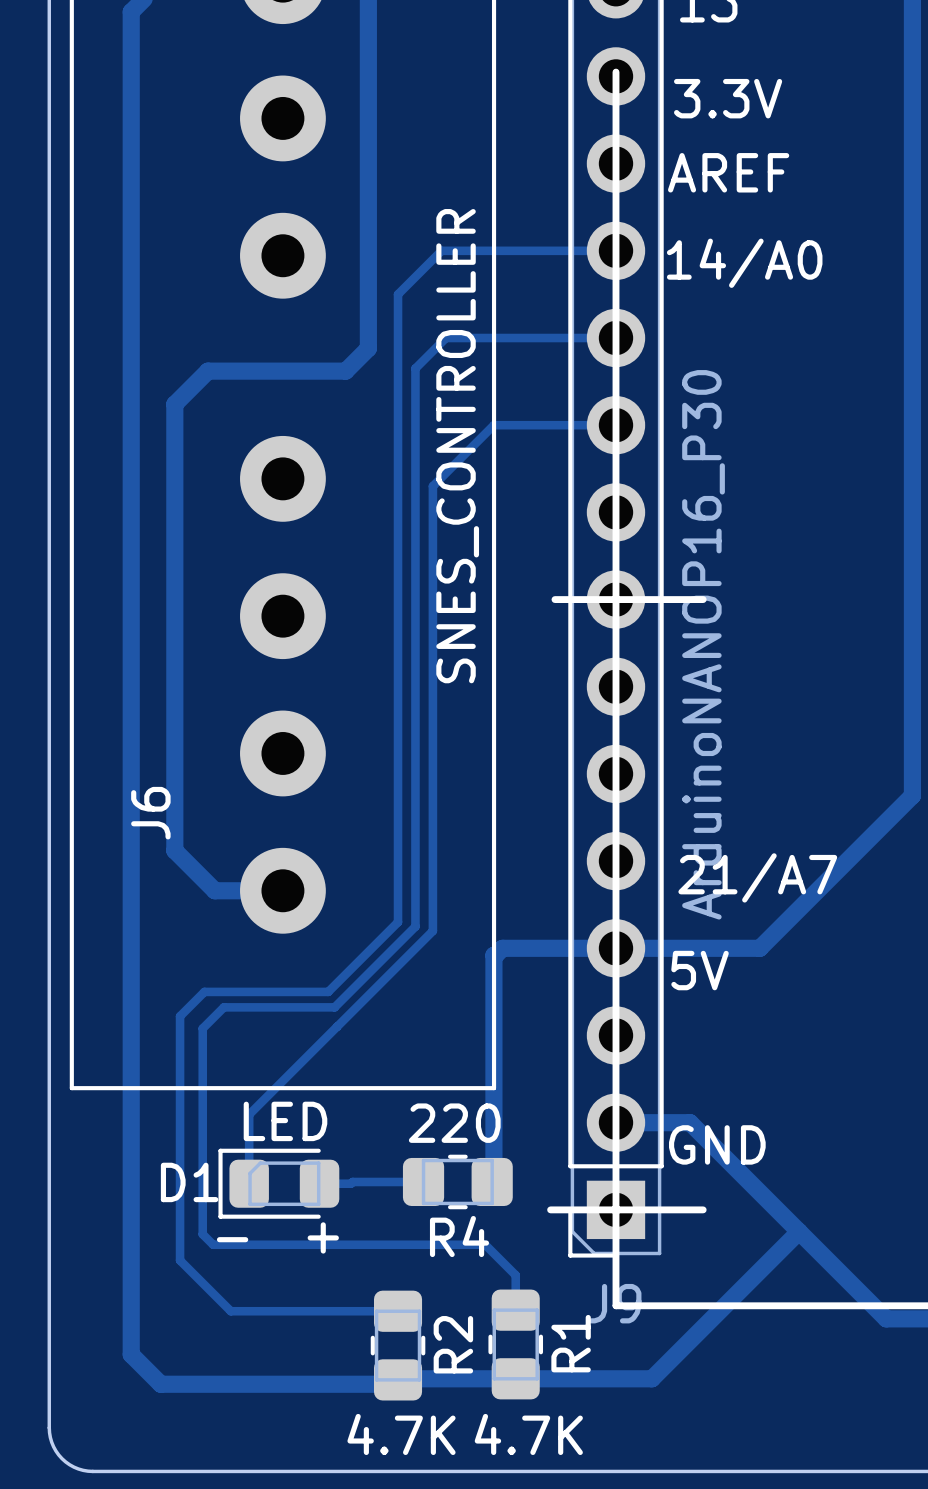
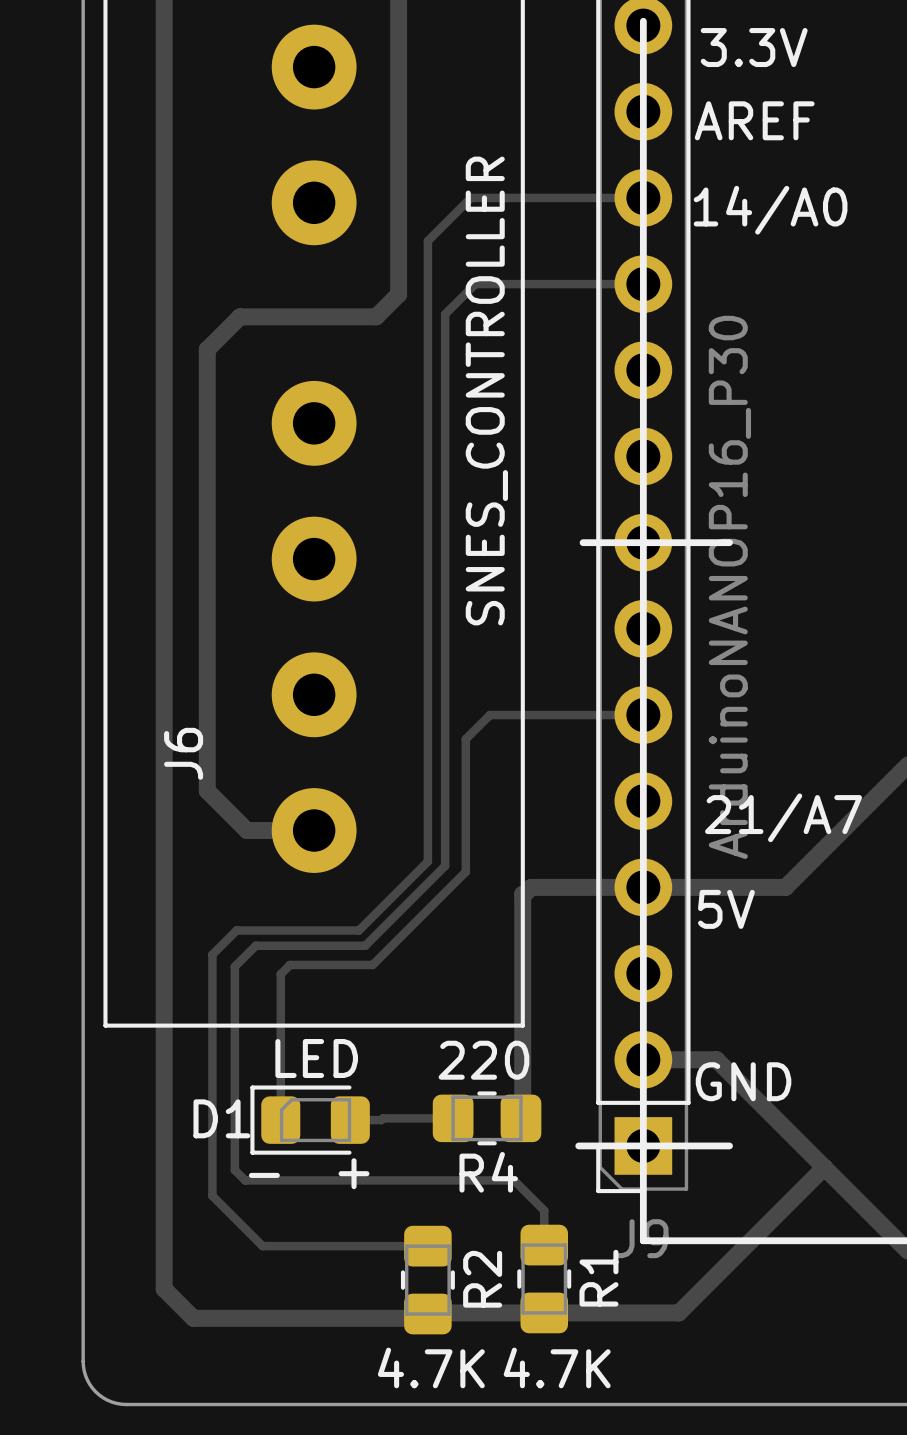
track: (615, 425) (493, 425) (432, 486) (432, 930) (249, 1114) -> (643, 715) (489, 715) (465, 739) (465, 871) (372, 964) (290, 964) (280, 974) (280, 1051)

